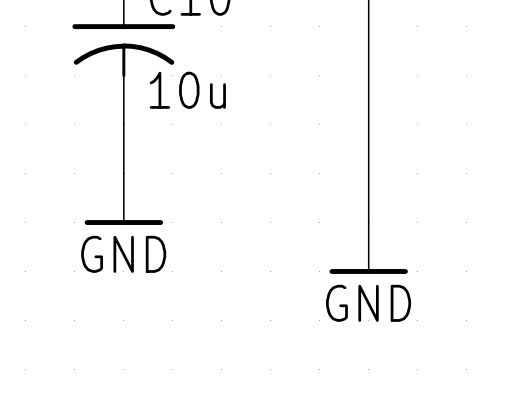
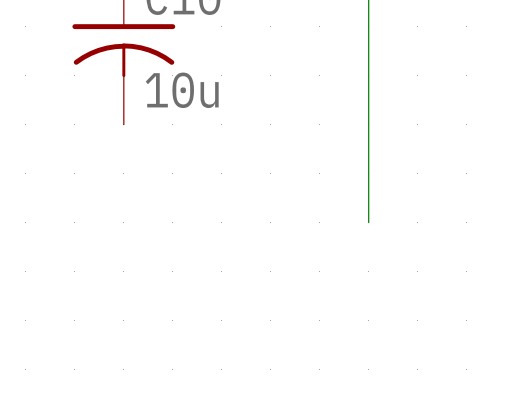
wire: (123, 124) (123, 173) -> none
power symbol: GND (123, 199) -> none
power symbol: GND (368, 248) -> none

